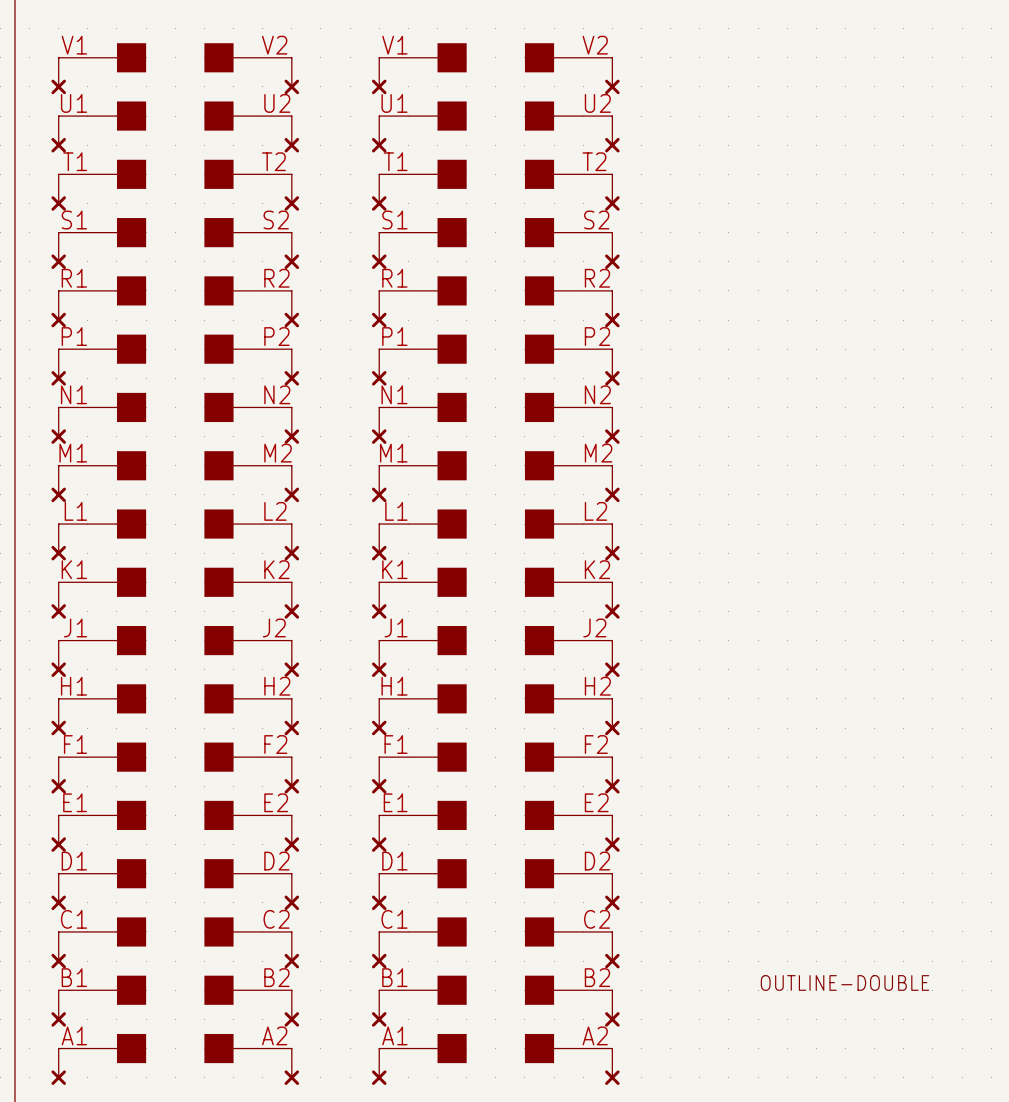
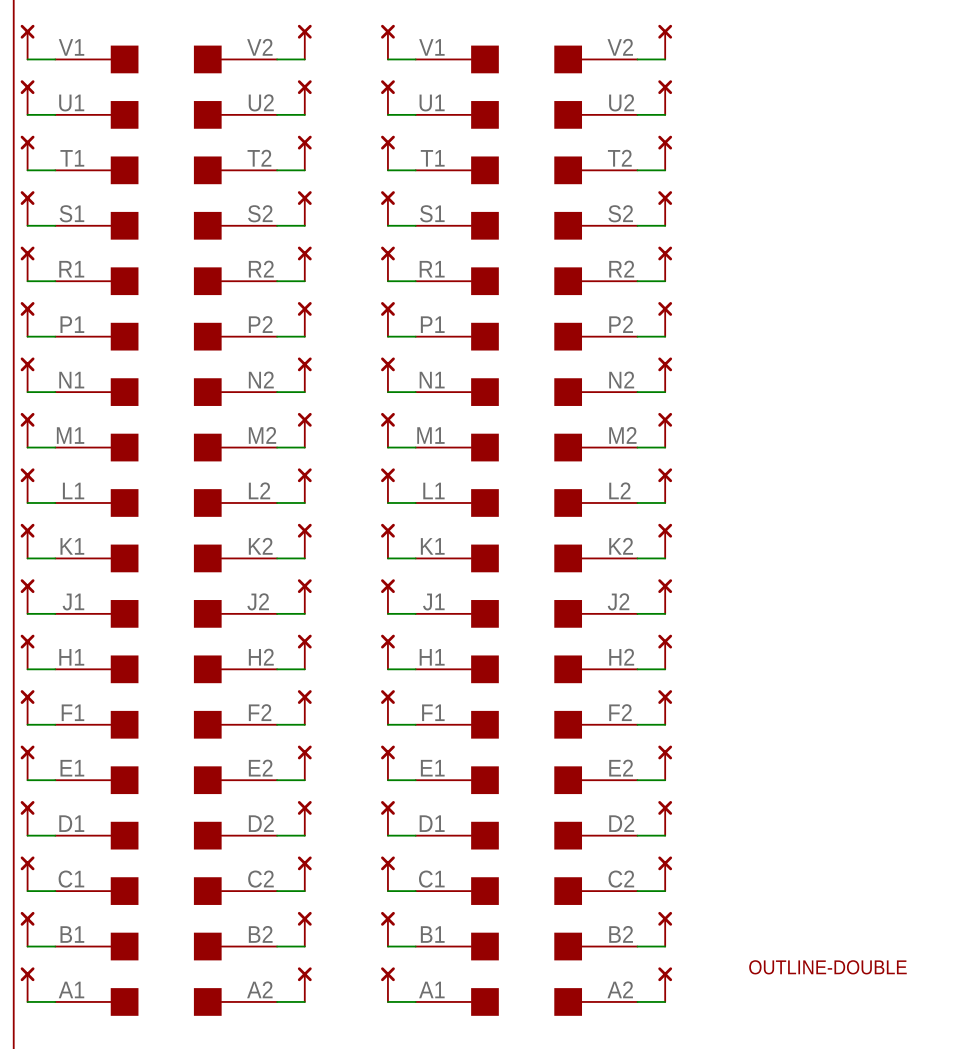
part: none -> (27, 42)
part: none -> (304, 42)
part: none -> (387, 42)
part: none -> (665, 42)
wire: none -> (27, 59) (55, 59)
wire: none -> (277, 59) (304, 59)
part position: (422, 57) -> (457, 59)
part position: (568, 57) -> (595, 59)
wire: none -> (637, 59) (665, 59)
part: (58, 75) -> none
part: (291, 75) -> none
part: (379, 75) -> none
part: (612, 75) -> none
part: none -> (27, 97)
part: none -> (304, 97)
part: none -> (387, 97)
part: none -> (665, 97)
wire: none -> (27, 114) (55, 114)
wire: none -> (277, 114) (304, 114)
part position: (422, 116) -> (457, 114)
part position: (568, 116) -> (595, 114)
wire: none -> (637, 114) (665, 114)
part: (58, 134) -> none
part: (291, 134) -> none
part: (379, 134) -> none
part: (612, 134) -> none
part: none -> (27, 153)
part: none -> (304, 153)
part: none -> (387, 153)
part: none -> (665, 153)
wire: none -> (27, 170) (55, 170)
wire: none -> (277, 170) (304, 170)
part position: (422, 174) -> (457, 170)
part position: (568, 174) -> (595, 170)
wire: none -> (637, 170) (665, 170)
part: (58, 192) -> none
part: (291, 192) -> none
part: (379, 192) -> none
part: (612, 192) -> none
part: none -> (27, 208)
part: none -> (304, 208)
part: none -> (387, 208)
part: none -> (665, 208)
wire: none -> (27, 225) (55, 225)
wire: none -> (277, 225) (304, 225)
part position: (422, 232) -> (457, 225)
part position: (568, 232) -> (595, 225)
wire: none -> (637, 225) (665, 225)
part: (58, 250) -> none
part: (291, 250) -> none
part: (379, 250) -> none
part: (612, 250) -> none
part: none -> (27, 263)
part: none -> (304, 263)
part: none -> (387, 263)
part: none -> (665, 263)
wire: none -> (27, 281) (55, 281)
wire: none -> (277, 281) (304, 281)
part position: (422, 290) -> (457, 281)
part position: (568, 290) -> (595, 281)
wire: none -> (637, 281) (665, 281)
part: (58, 309) -> none
part: (291, 309) -> none
part: (379, 309) -> none
part: (612, 309) -> none
part: none -> (27, 319)
part: none -> (304, 319)
part: none -> (387, 319)
part: none -> (665, 319)
wire: none -> (27, 336) (55, 336)
wire: none -> (277, 336) (304, 336)
part position: (422, 349) -> (457, 336)
part position: (568, 349) -> (595, 336)
wire: none -> (637, 336) (665, 336)
part: (58, 367) -> none
part: (291, 367) -> none
part: (379, 367) -> none
part: (612, 367) -> none
part: none -> (27, 374)
part: none -> (304, 374)
part: none -> (387, 374)
part: none -> (665, 374)
wire: none -> (27, 392) (55, 392)
wire: none -> (277, 392) (304, 392)
part position: (422, 407) -> (457, 392)
part position: (568, 407) -> (595, 392)
wire: none -> (637, 392) (665, 392)
part: (58, 425) -> none
part: (291, 425) -> none
part: (379, 425) -> none
part: (612, 425) -> none
part: none -> (27, 430)
part: none -> (304, 430)
part: none -> (387, 430)
part: none -> (665, 430)
wire: none -> (27, 447) (55, 447)
wire: none -> (277, 447) (304, 447)
part position: (422, 465) -> (457, 447)
part position: (568, 465) -> (595, 447)
wire: none -> (637, 447) (665, 447)
part: (58, 483) -> none
part: (291, 483) -> none
part: (379, 483) -> none
part: (612, 483) -> none
part: none -> (27, 485)
part: none -> (304, 485)
part: none -> (387, 485)
part: none -> (665, 485)
wire: none -> (27, 502) (55, 502)
wire: none -> (277, 502) (304, 502)
part position: (422, 524) -> (457, 502)
part position: (568, 524) -> (595, 502)
wire: none -> (637, 502) (665, 502)
part: (58, 542) -> none
part: (291, 542) -> none
part: (379, 542) -> none
part: (612, 542) -> none
part: none -> (27, 541)
part: none -> (304, 541)
part: none -> (387, 541)
part: none -> (665, 541)
wire: none -> (27, 558) (55, 558)
wire: none -> (277, 558) (304, 558)
part position: (422, 582) -> (457, 558)
part position: (568, 582) -> (595, 558)
wire: none -> (637, 558) (665, 558)
part: (58, 600) -> none
part: (291, 600) -> none
part: (379, 600) -> none
part: (612, 600) -> none
part: none -> (27, 596)
part: none -> (304, 596)
part: none -> (387, 596)
part: none -> (665, 596)
wire: none -> (27, 613) (55, 613)
wire: none -> (277, 613) (304, 613)
part position: (422, 640) -> (457, 613)
part position: (568, 640) -> (595, 613)
wire: none -> (637, 613) (665, 613)
part: (58, 658) -> none
part: (291, 658) -> none
part: (379, 658) -> none
part: (612, 658) -> none
part: none -> (27, 651)
part: none -> (304, 651)
part: none -> (387, 651)
part: none -> (665, 651)
wire: none -> (27, 669) (55, 669)
wire: none -> (277, 669) (304, 669)
part position: (422, 698) -> (457, 669)
part position: (568, 698) -> (595, 669)
wire: none -> (637, 669) (665, 669)
part: (58, 717) -> none
part: (291, 717) -> none
part: (379, 717) -> none
part: (612, 717) -> none
part: none -> (27, 707)
part: none -> (304, 707)
part: none -> (387, 707)
part: none -> (665, 707)
wire: none -> (27, 724) (55, 724)
wire: none -> (277, 724) (304, 724)
part position: (422, 757) -> (457, 724)
part position: (568, 757) -> (595, 724)
wire: none -> (637, 724) (665, 724)
part: (58, 775) -> none
part: (291, 775) -> none
part: (379, 775) -> none
part: (612, 775) -> none
part: none -> (27, 762)
part: none -> (304, 762)
part: none -> (387, 762)
part: none -> (665, 762)
wire: none -> (27, 780) (55, 780)
wire: none -> (277, 780) (304, 780)
part position: (422, 815) -> (457, 780)
part position: (568, 815) -> (595, 780)
wire: none -> (637, 780) (665, 780)
part: (58, 833) -> none
part: (291, 833) -> none
part: (379, 833) -> none
part: (612, 833) -> none
part: none -> (27, 818)
part: none -> (304, 818)
part: none -> (387, 818)
part: none -> (665, 818)
wire: none -> (27, 835) (55, 835)
wire: none -> (277, 835) (304, 835)
part position: (422, 873) -> (457, 835)
part position: (568, 873) -> (595, 835)
wire: none -> (637, 835) (665, 835)
part: (58, 891) -> none
part: (291, 891) -> none
part: (379, 891) -> none
part: (612, 891) -> none
part: none -> (27, 873)
part: none -> (304, 873)
part: none -> (387, 873)
part: none -> (665, 873)
wire: none -> (27, 891) (55, 891)
wire: none -> (277, 891) (304, 891)
part position: (422, 931) -> (457, 891)
part position: (568, 931) -> (595, 891)
wire: none -> (637, 891) (665, 891)
part: (58, 950) -> none
part: (291, 950) -> none
part: (379, 950) -> none
part: (612, 950) -> none
part: none -> (27, 929)
part: none -> (304, 929)
part: none -> (387, 929)
part: none -> (665, 929)
part position: (845, 982) -> (827, 967)
wire: none -> (27, 946) (55, 946)
wire: none -> (277, 946) (304, 946)
part position: (422, 990) -> (457, 946)
part position: (568, 990) -> (595, 946)
wire: none -> (637, 946) (665, 946)
part: (58, 1008) -> none
part: (291, 1008) -> none
part: (379, 1008) -> none
part: (612, 1008) -> none
part: none -> (27, 984)
part: none -> (304, 984)
part: none -> (387, 984)
part: none -> (665, 984)
wire: none -> (27, 1001) (55, 1001)
wire: none -> (277, 1001) (304, 1001)
part position: (422, 1048) -> (457, 1001)
part position: (568, 1048) -> (595, 1001)
wire: none -> (637, 1001) (665, 1001)
part: (58, 1066) -> none
part: (291, 1066) -> none
part: (379, 1066) -> none
part: (612, 1066) -> none

